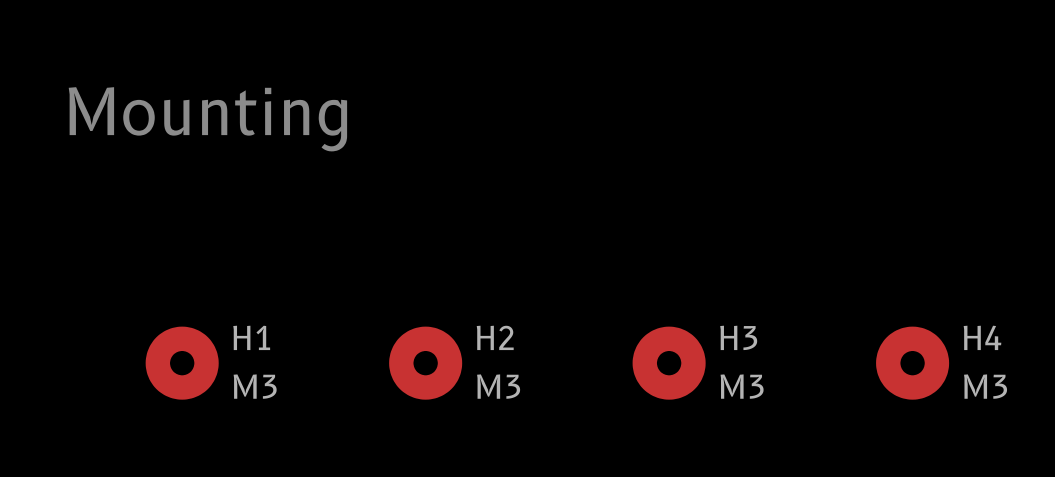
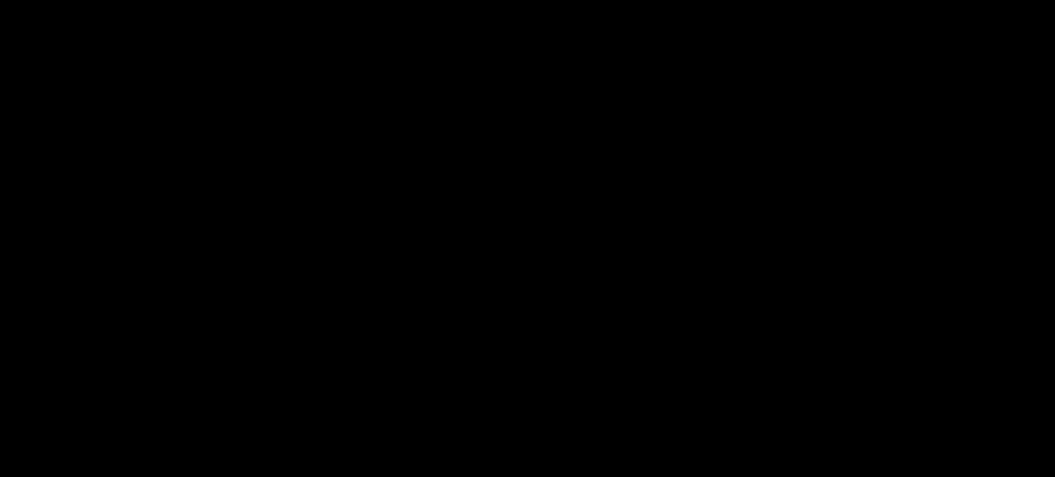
text: Mounting (207, 119) -> none
H1: M3 (182, 363) -> none
H2: M3 (425, 363) -> none
H3: M3 (669, 363) -> none
H4: M3 (912, 363) -> none

